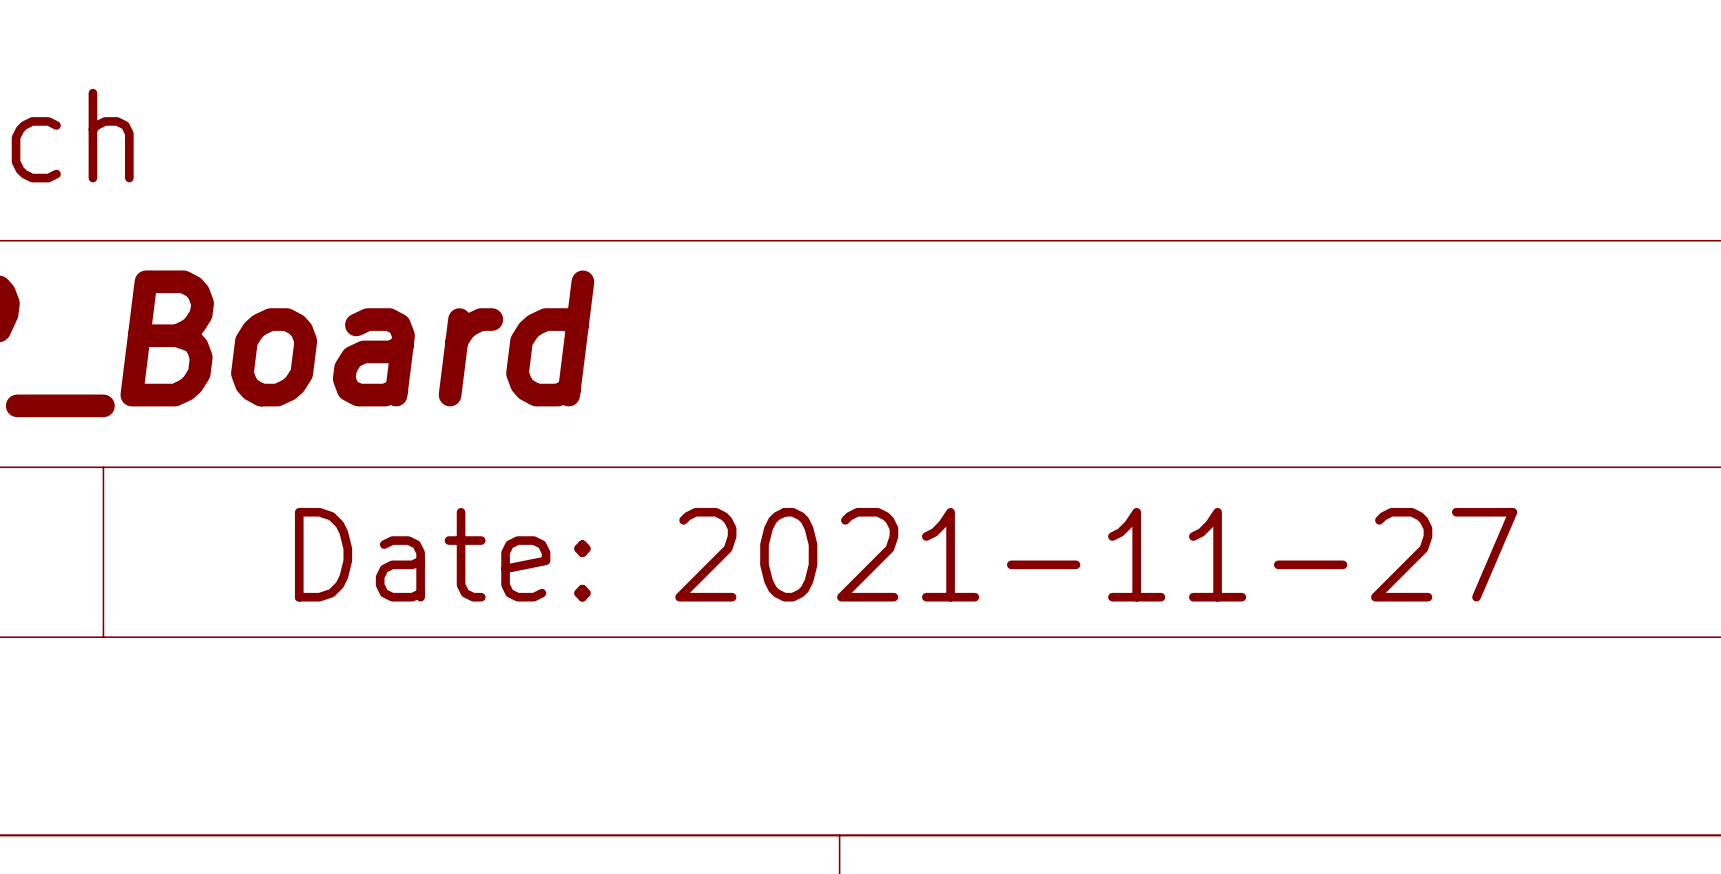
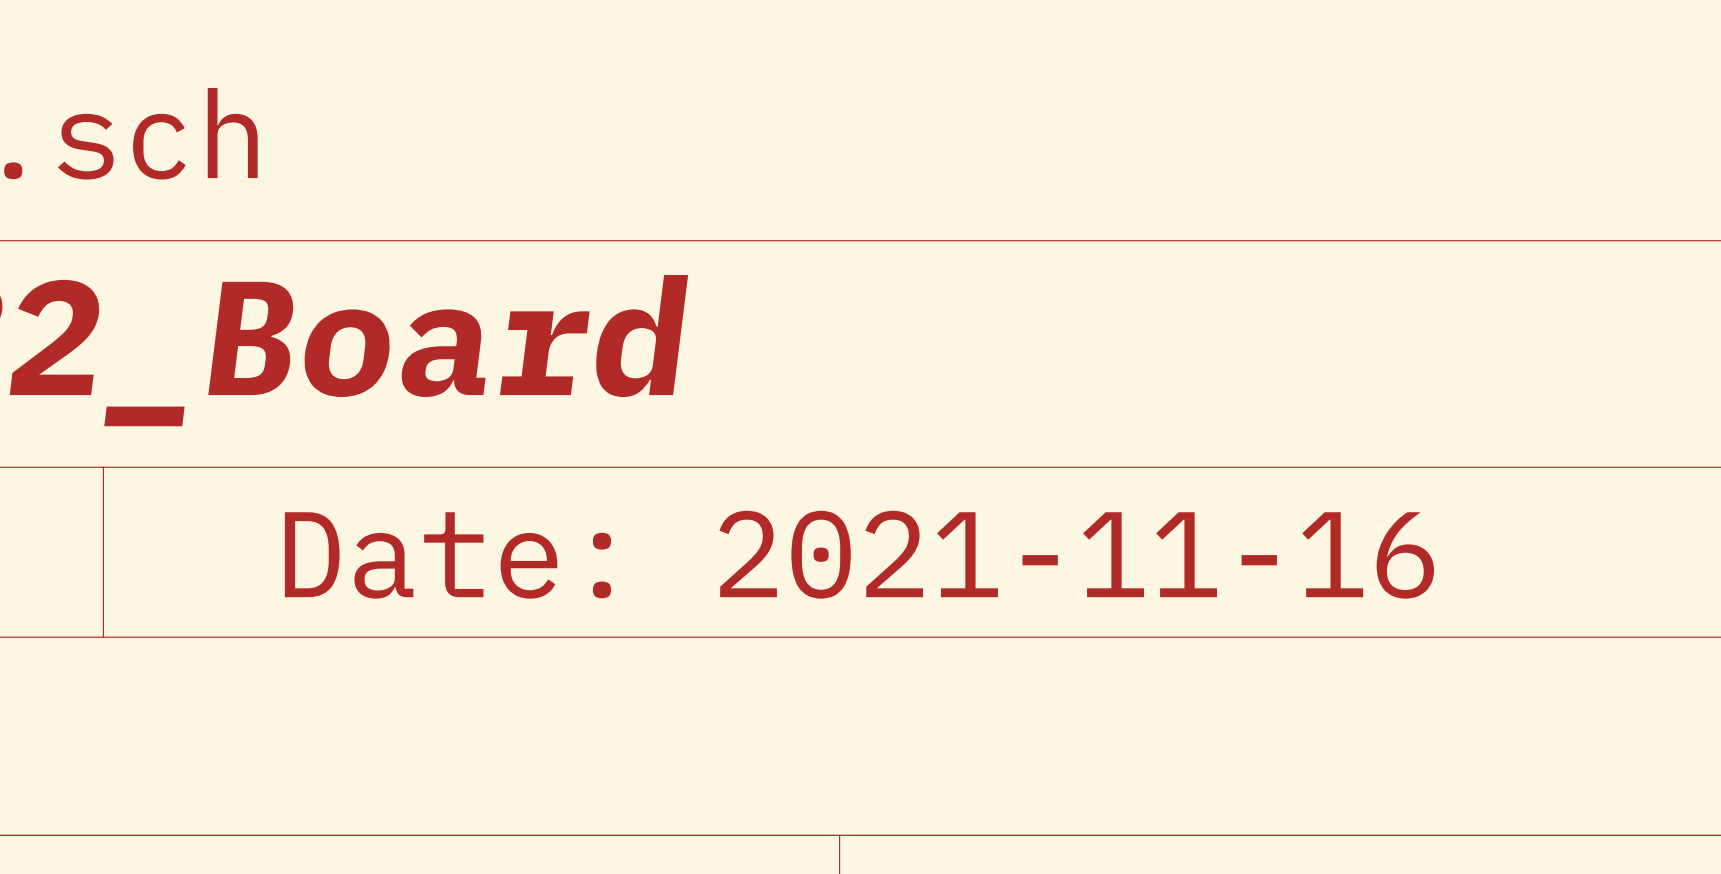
title block: Date: 2021-11-27 (906, 554) -> Date: 2021-11-16 (859, 554)

